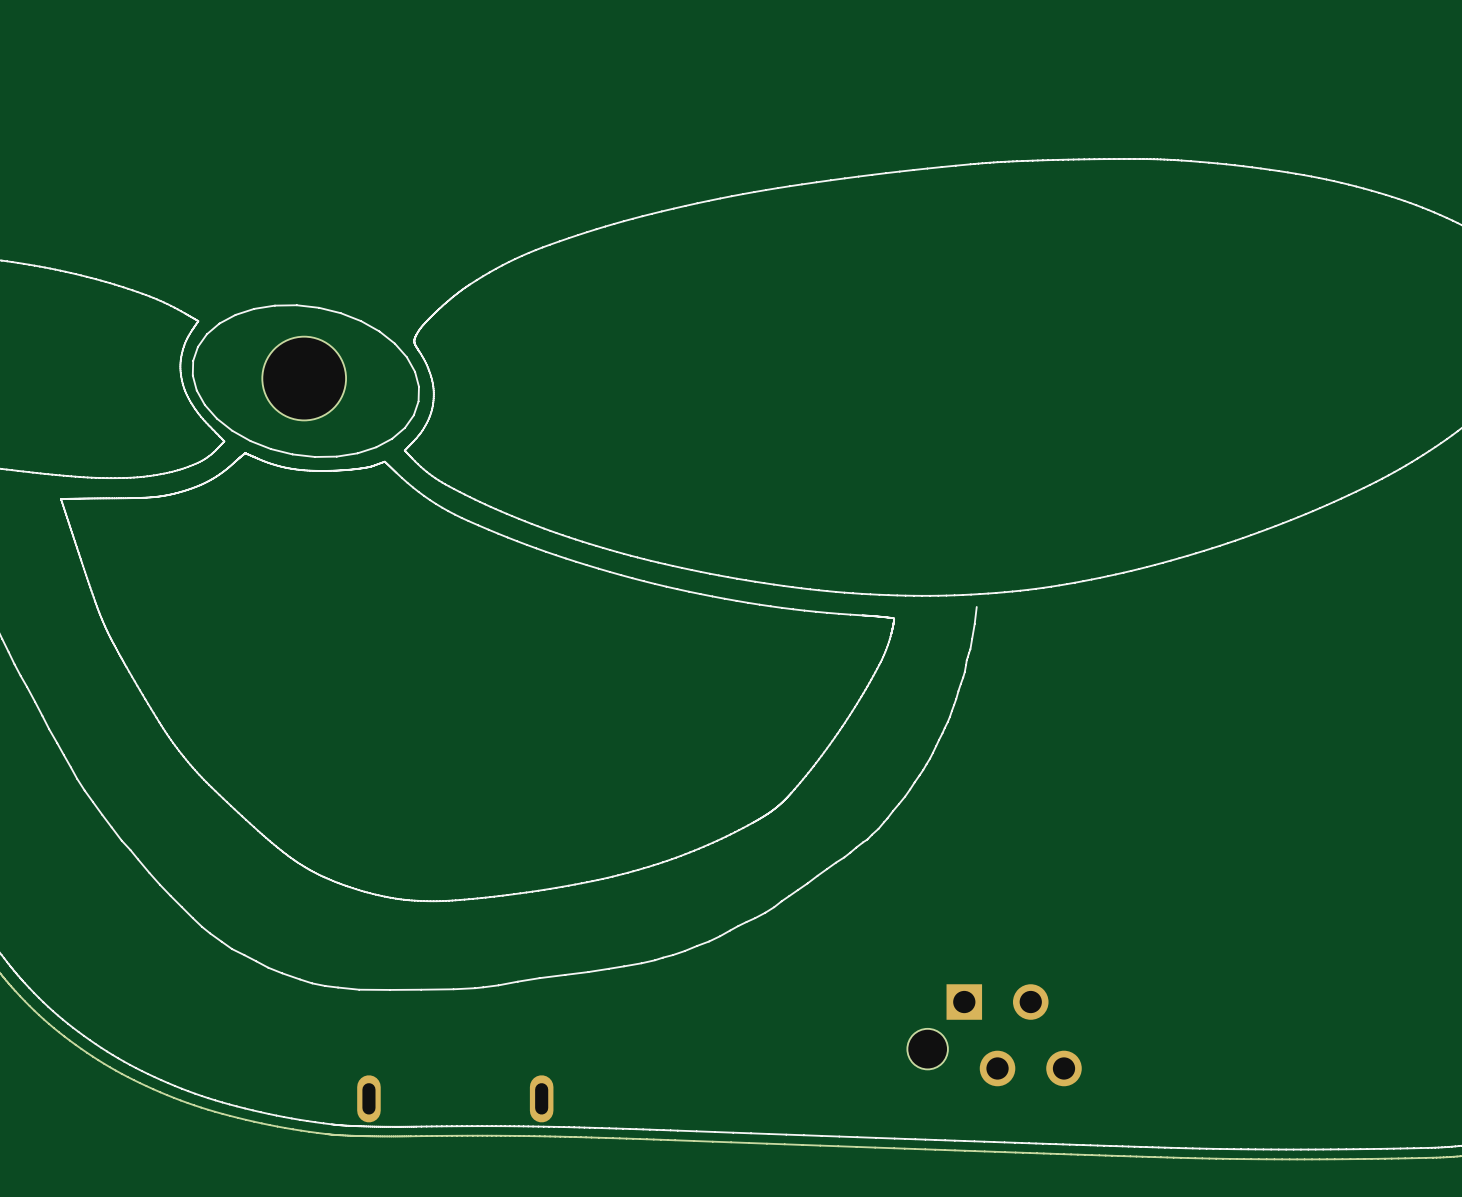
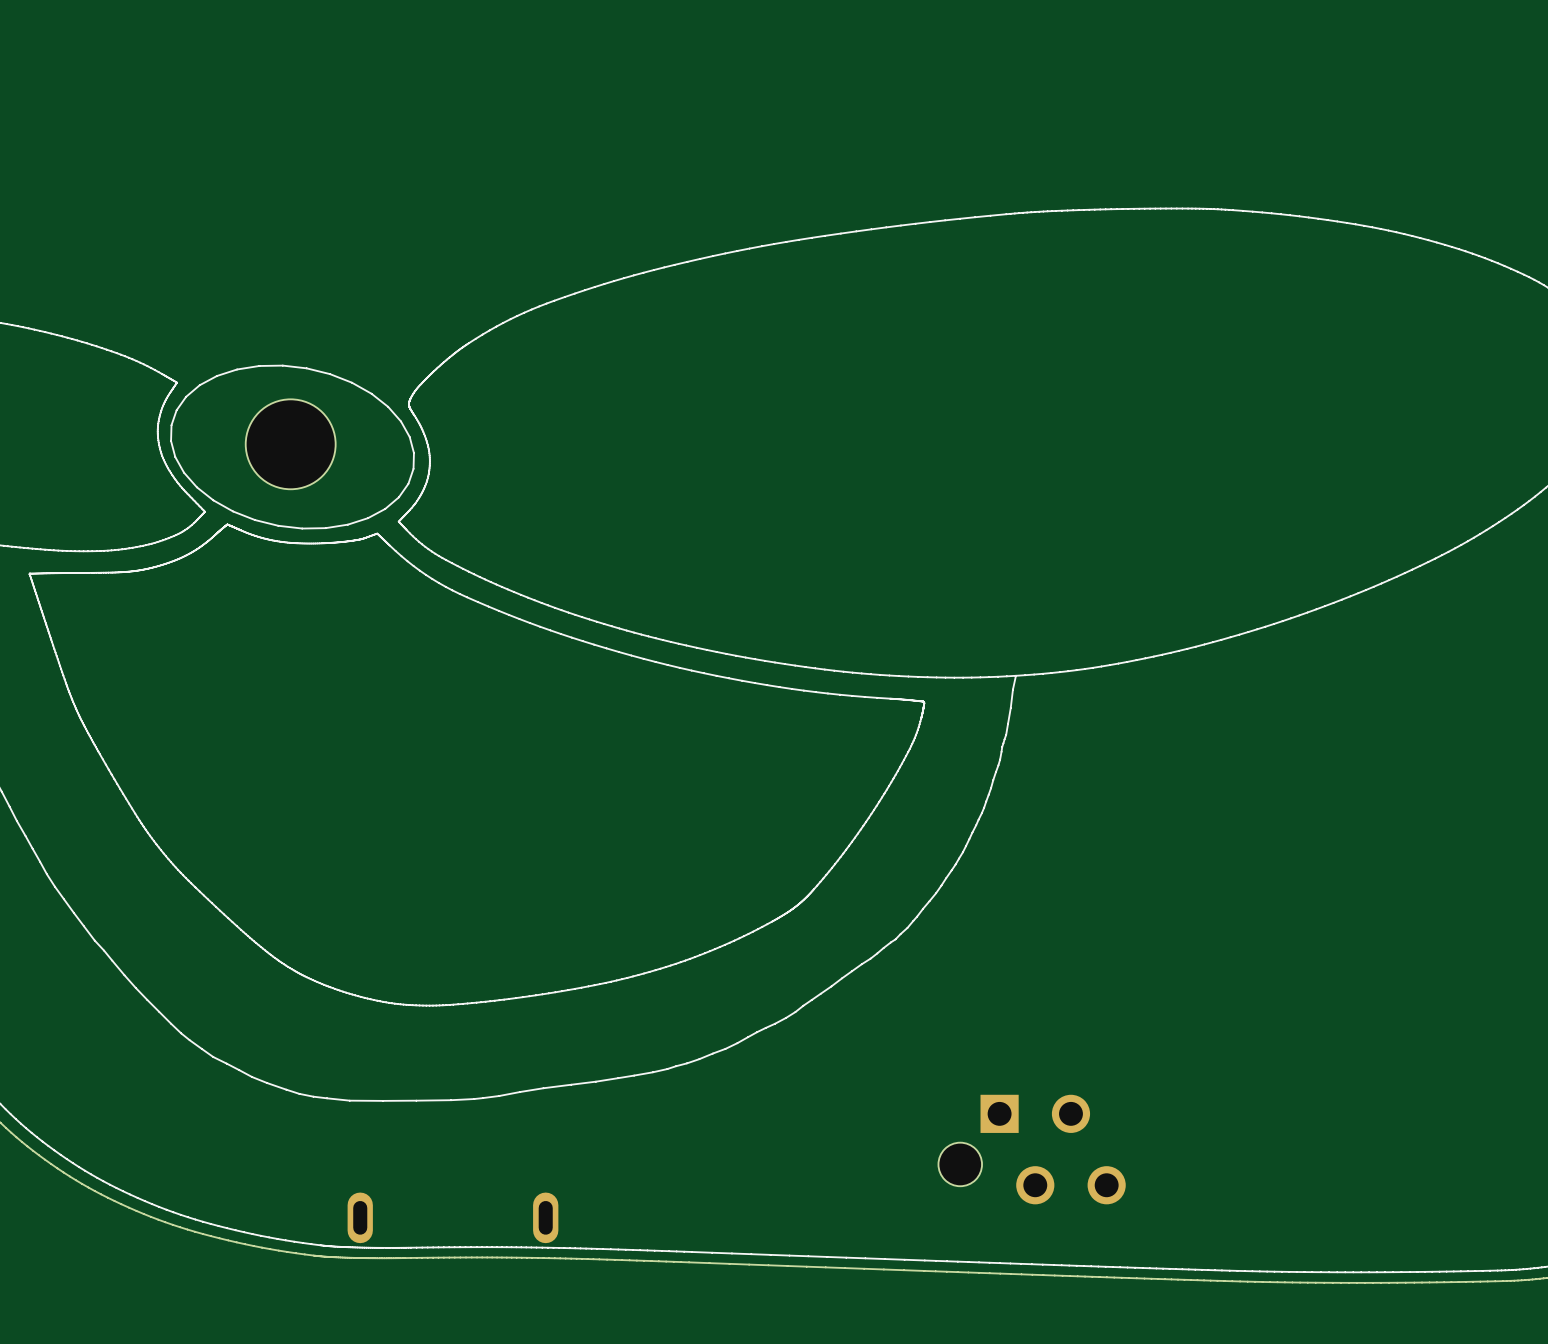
line: none -> (1015, 675) (1012, 689)

